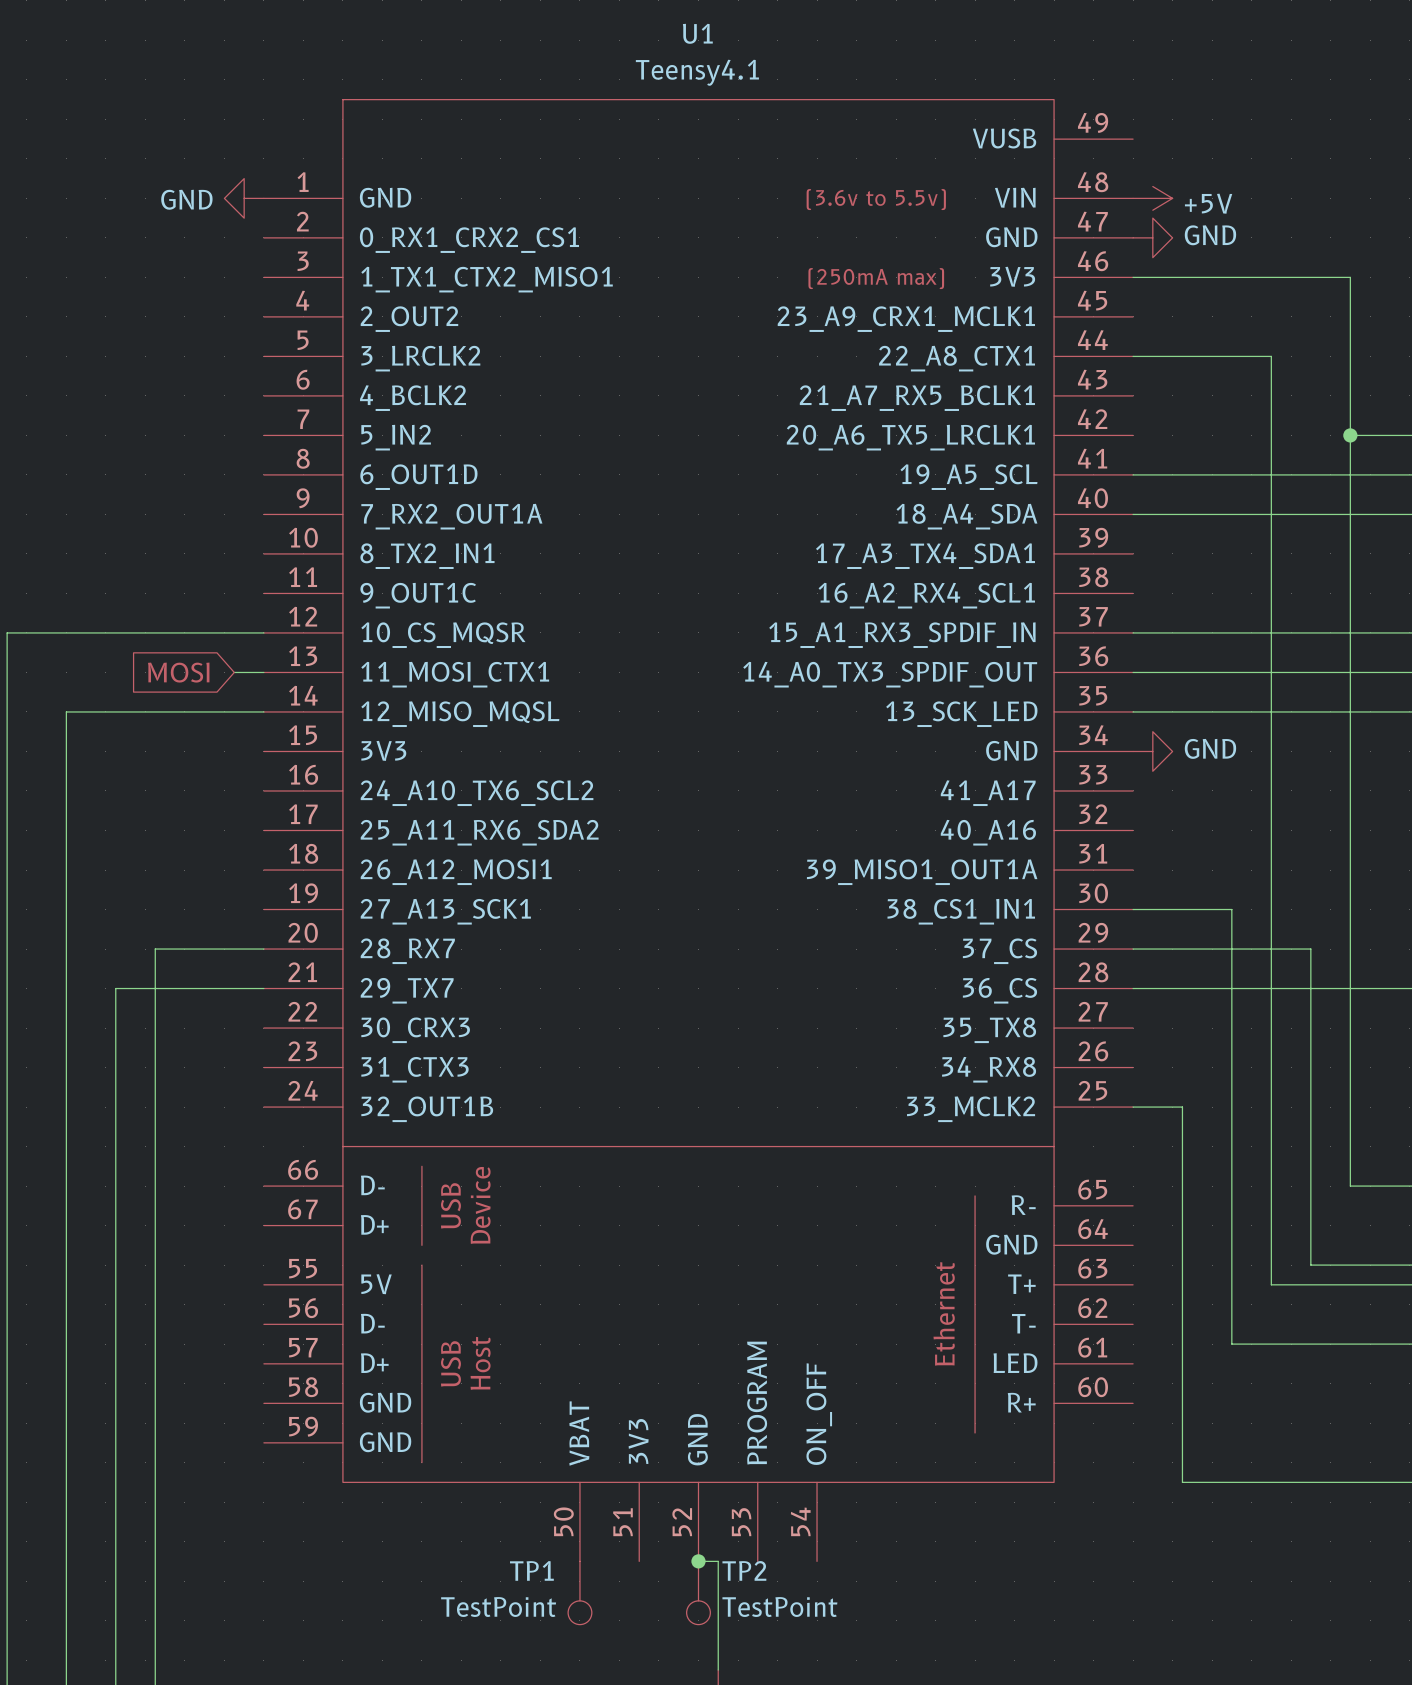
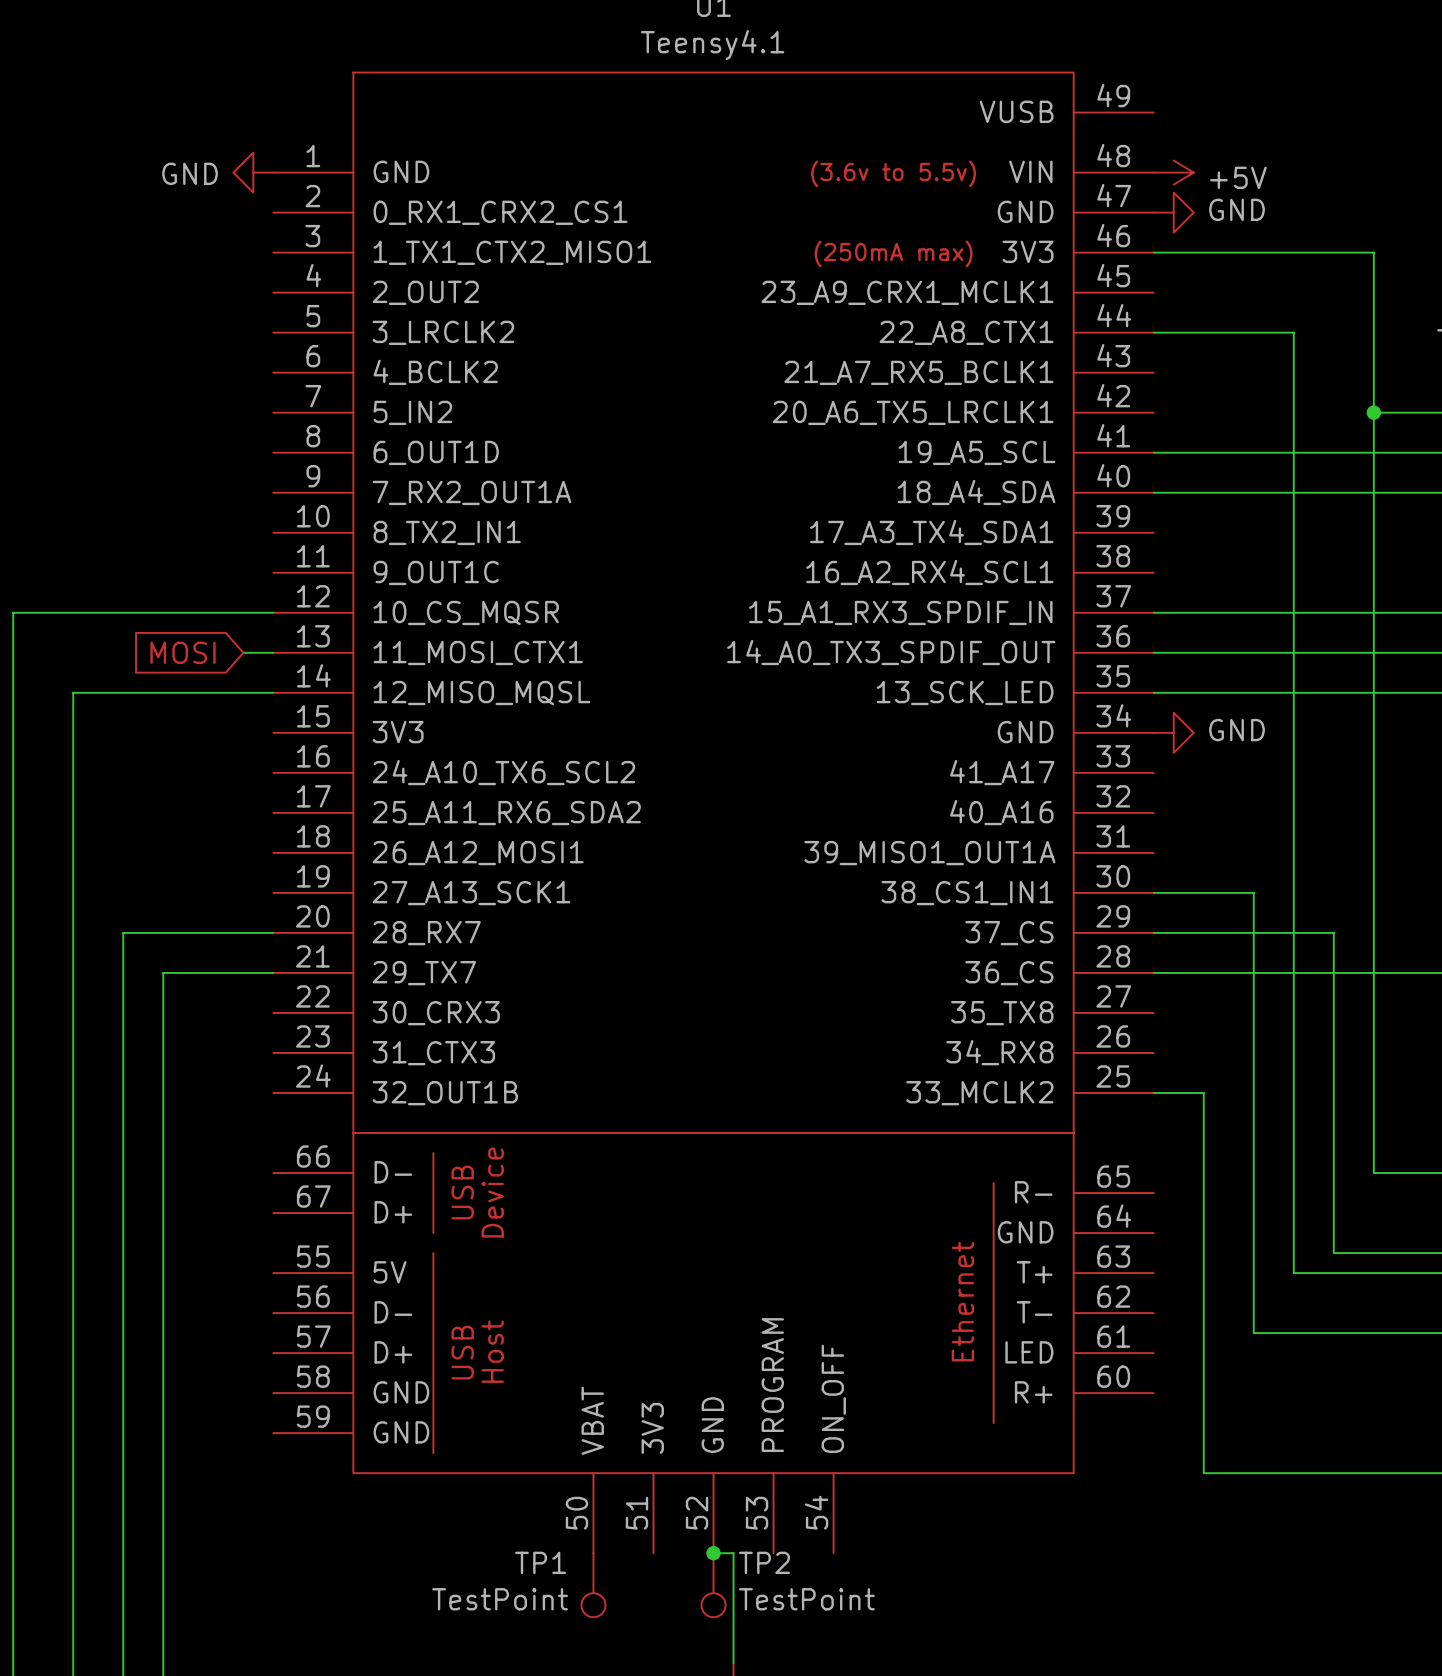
wire: (155, 949) (155, 988) (115, 988) -> (163, 932) (123, 932) (123, 972)

